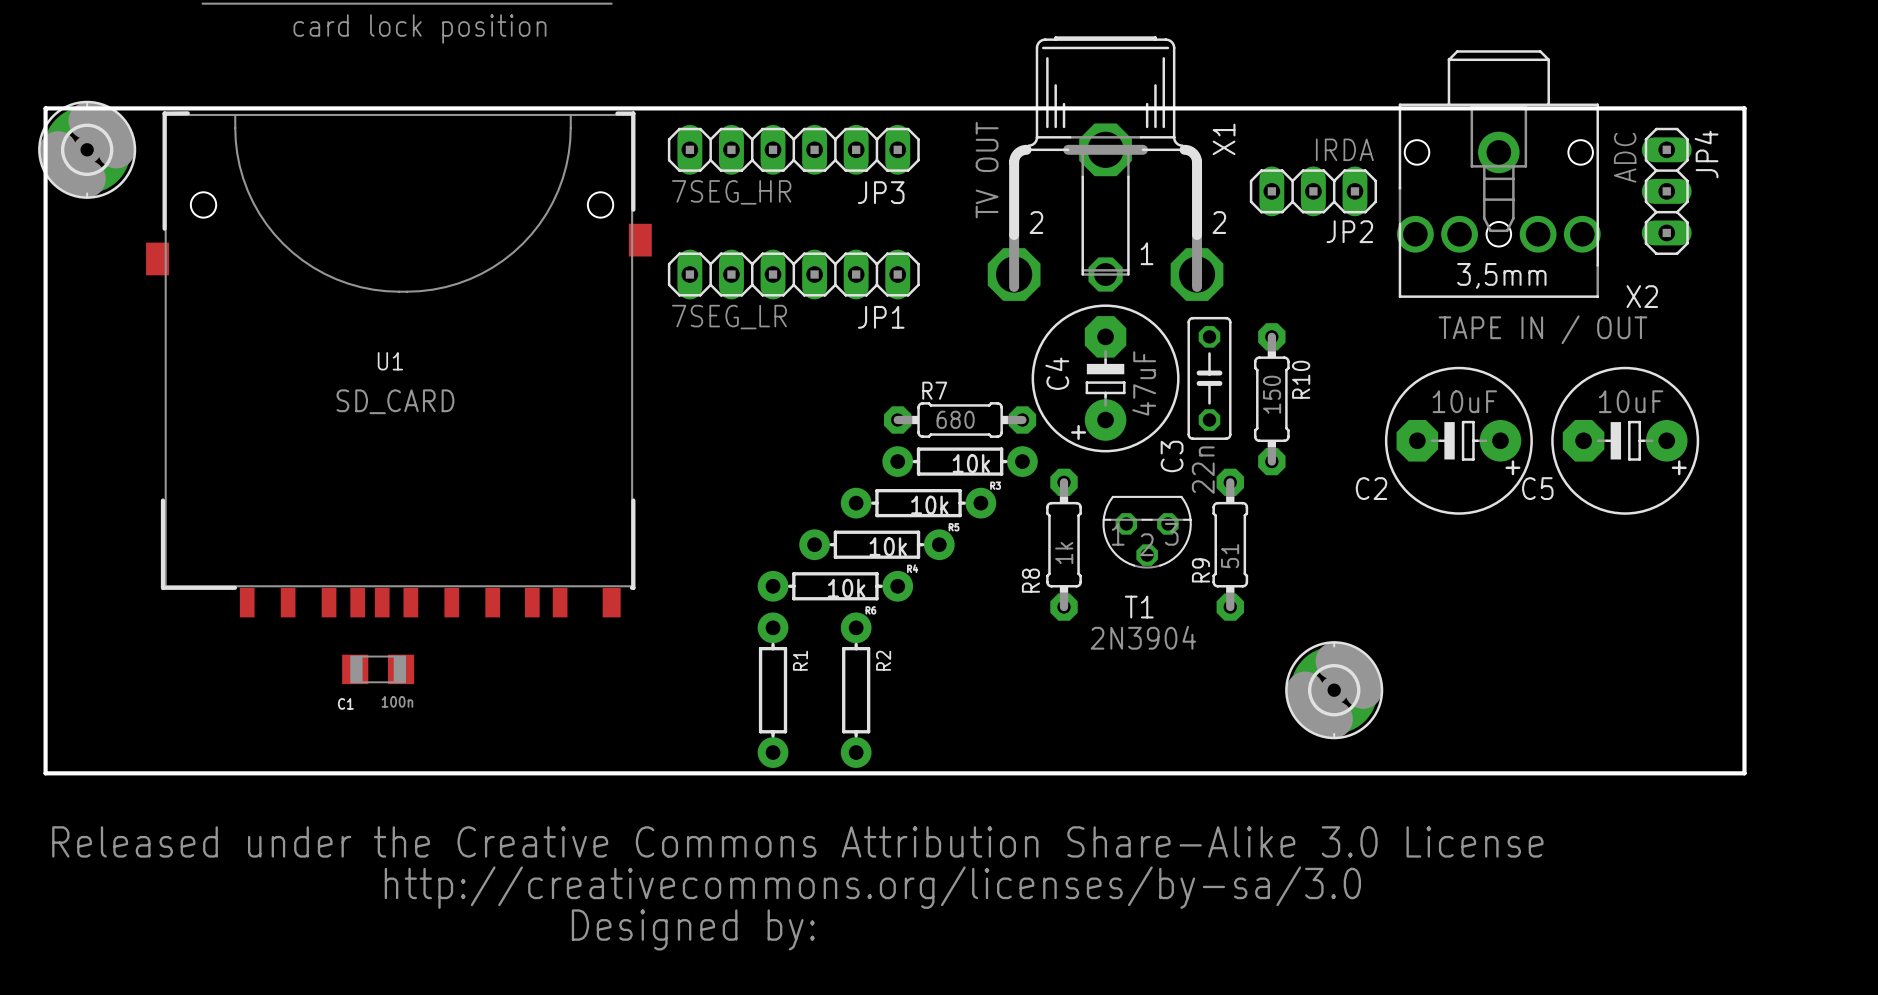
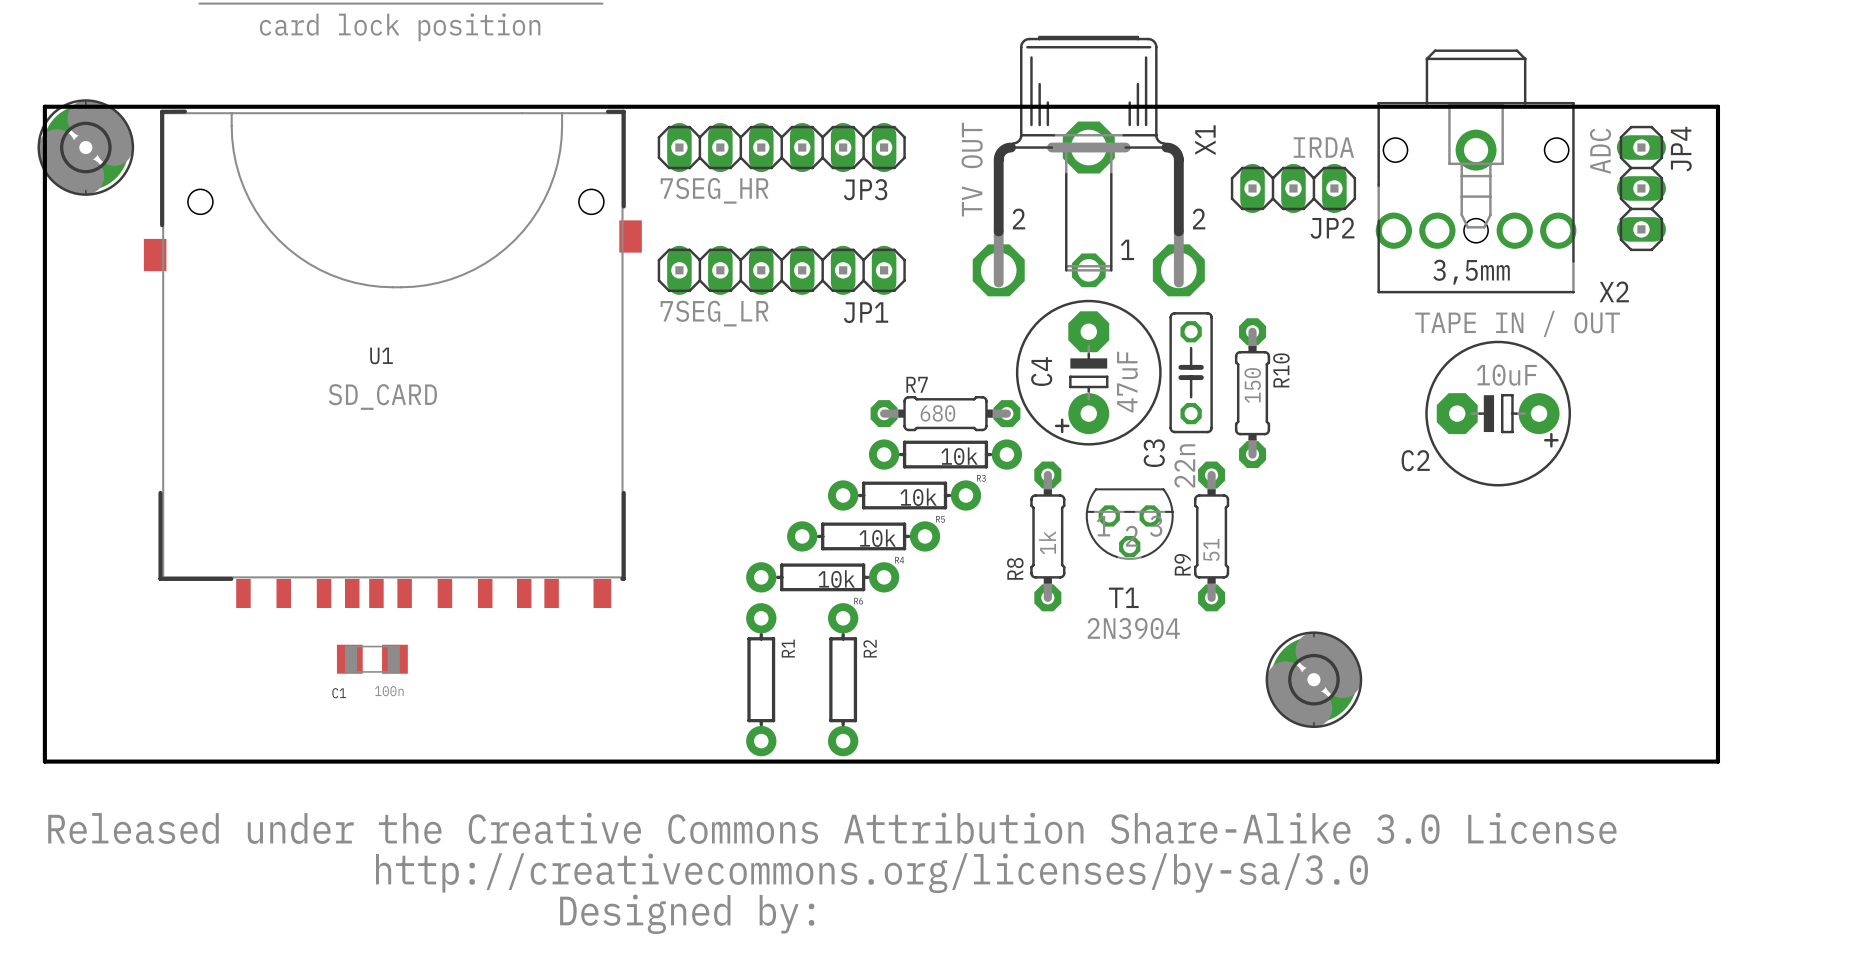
C2 position: (1458, 440) -> (1498, 413)
C5: 10uF (1625, 440) -> none

